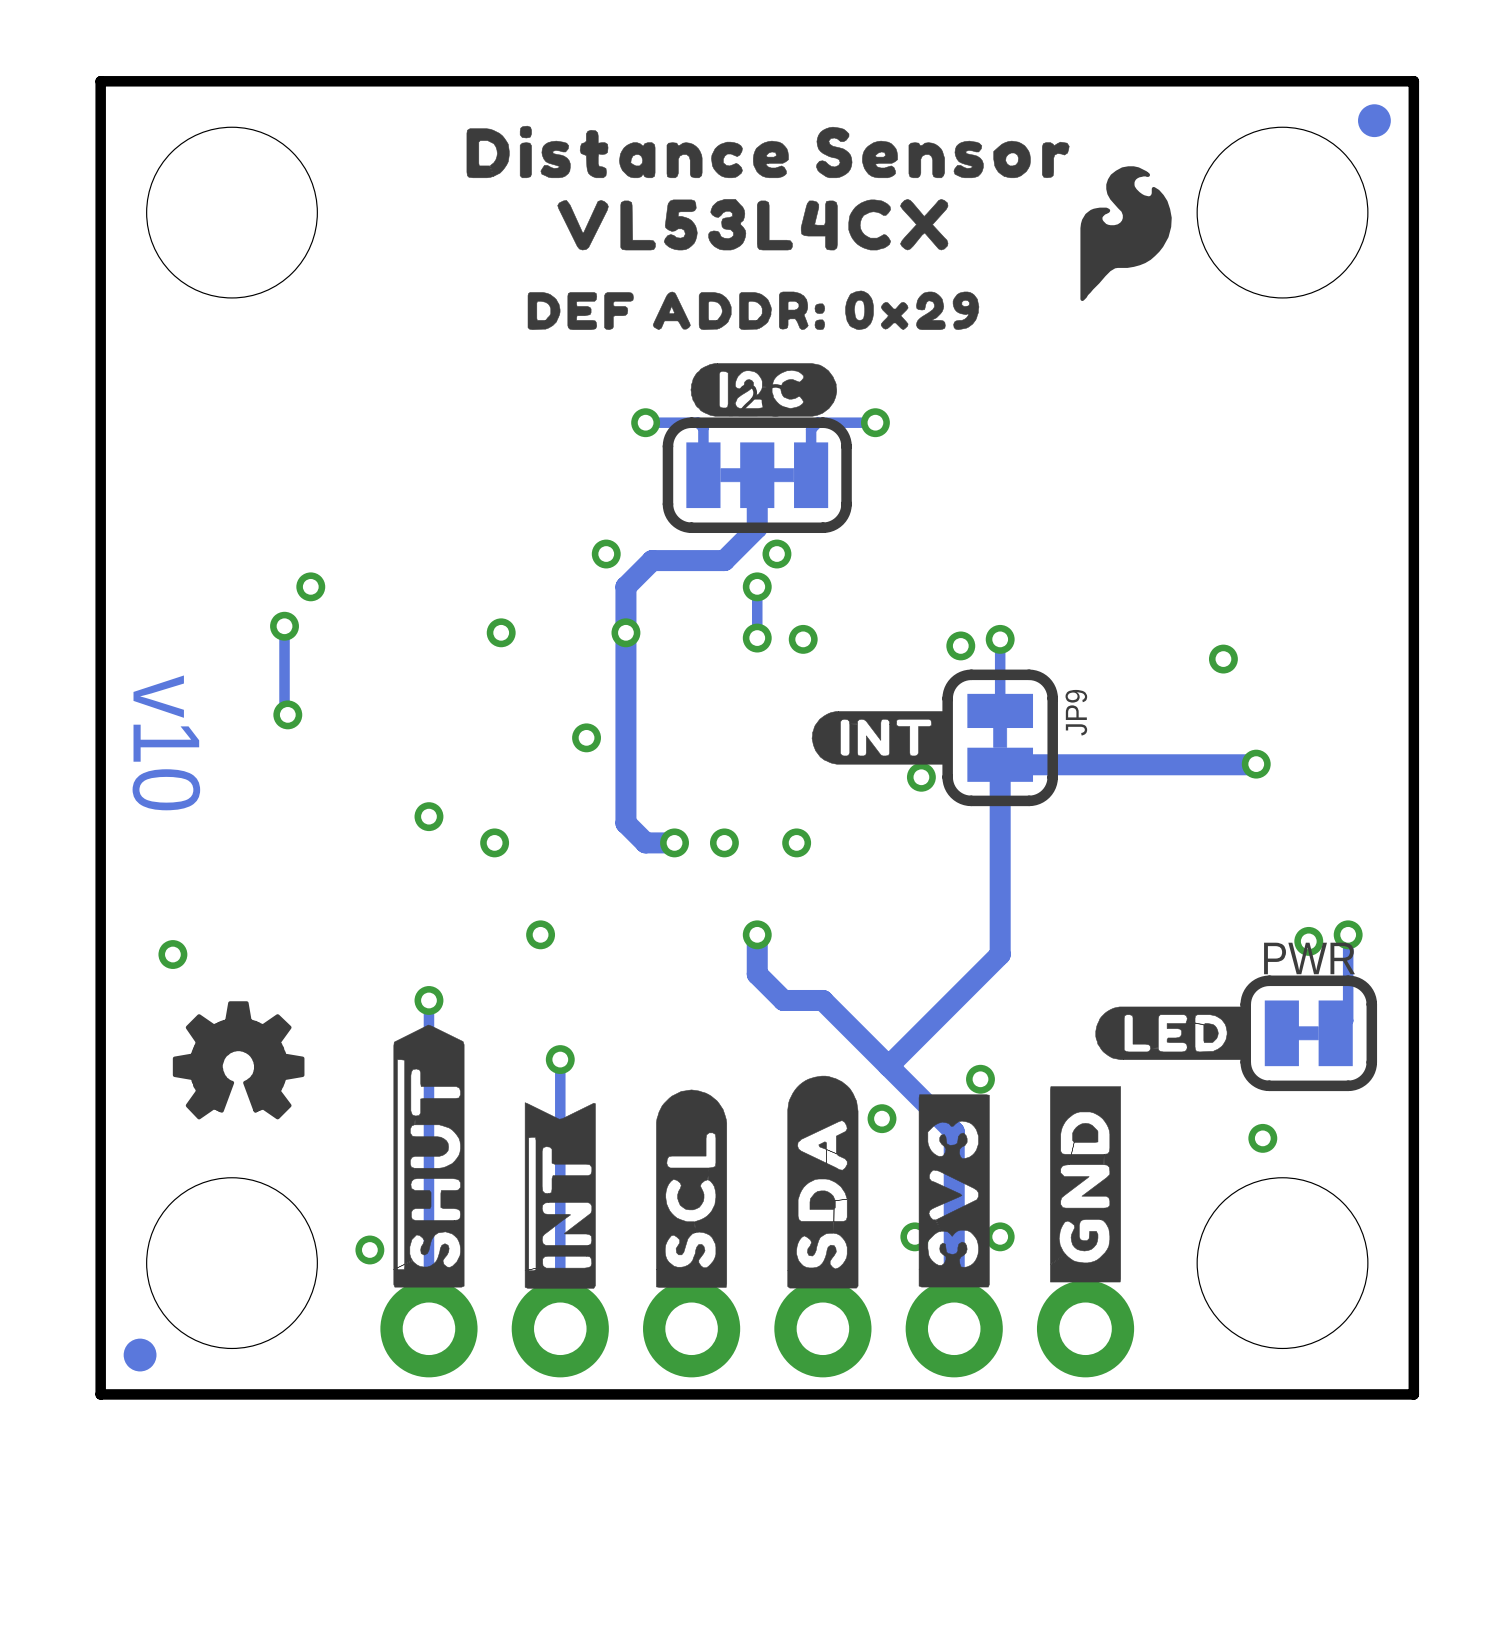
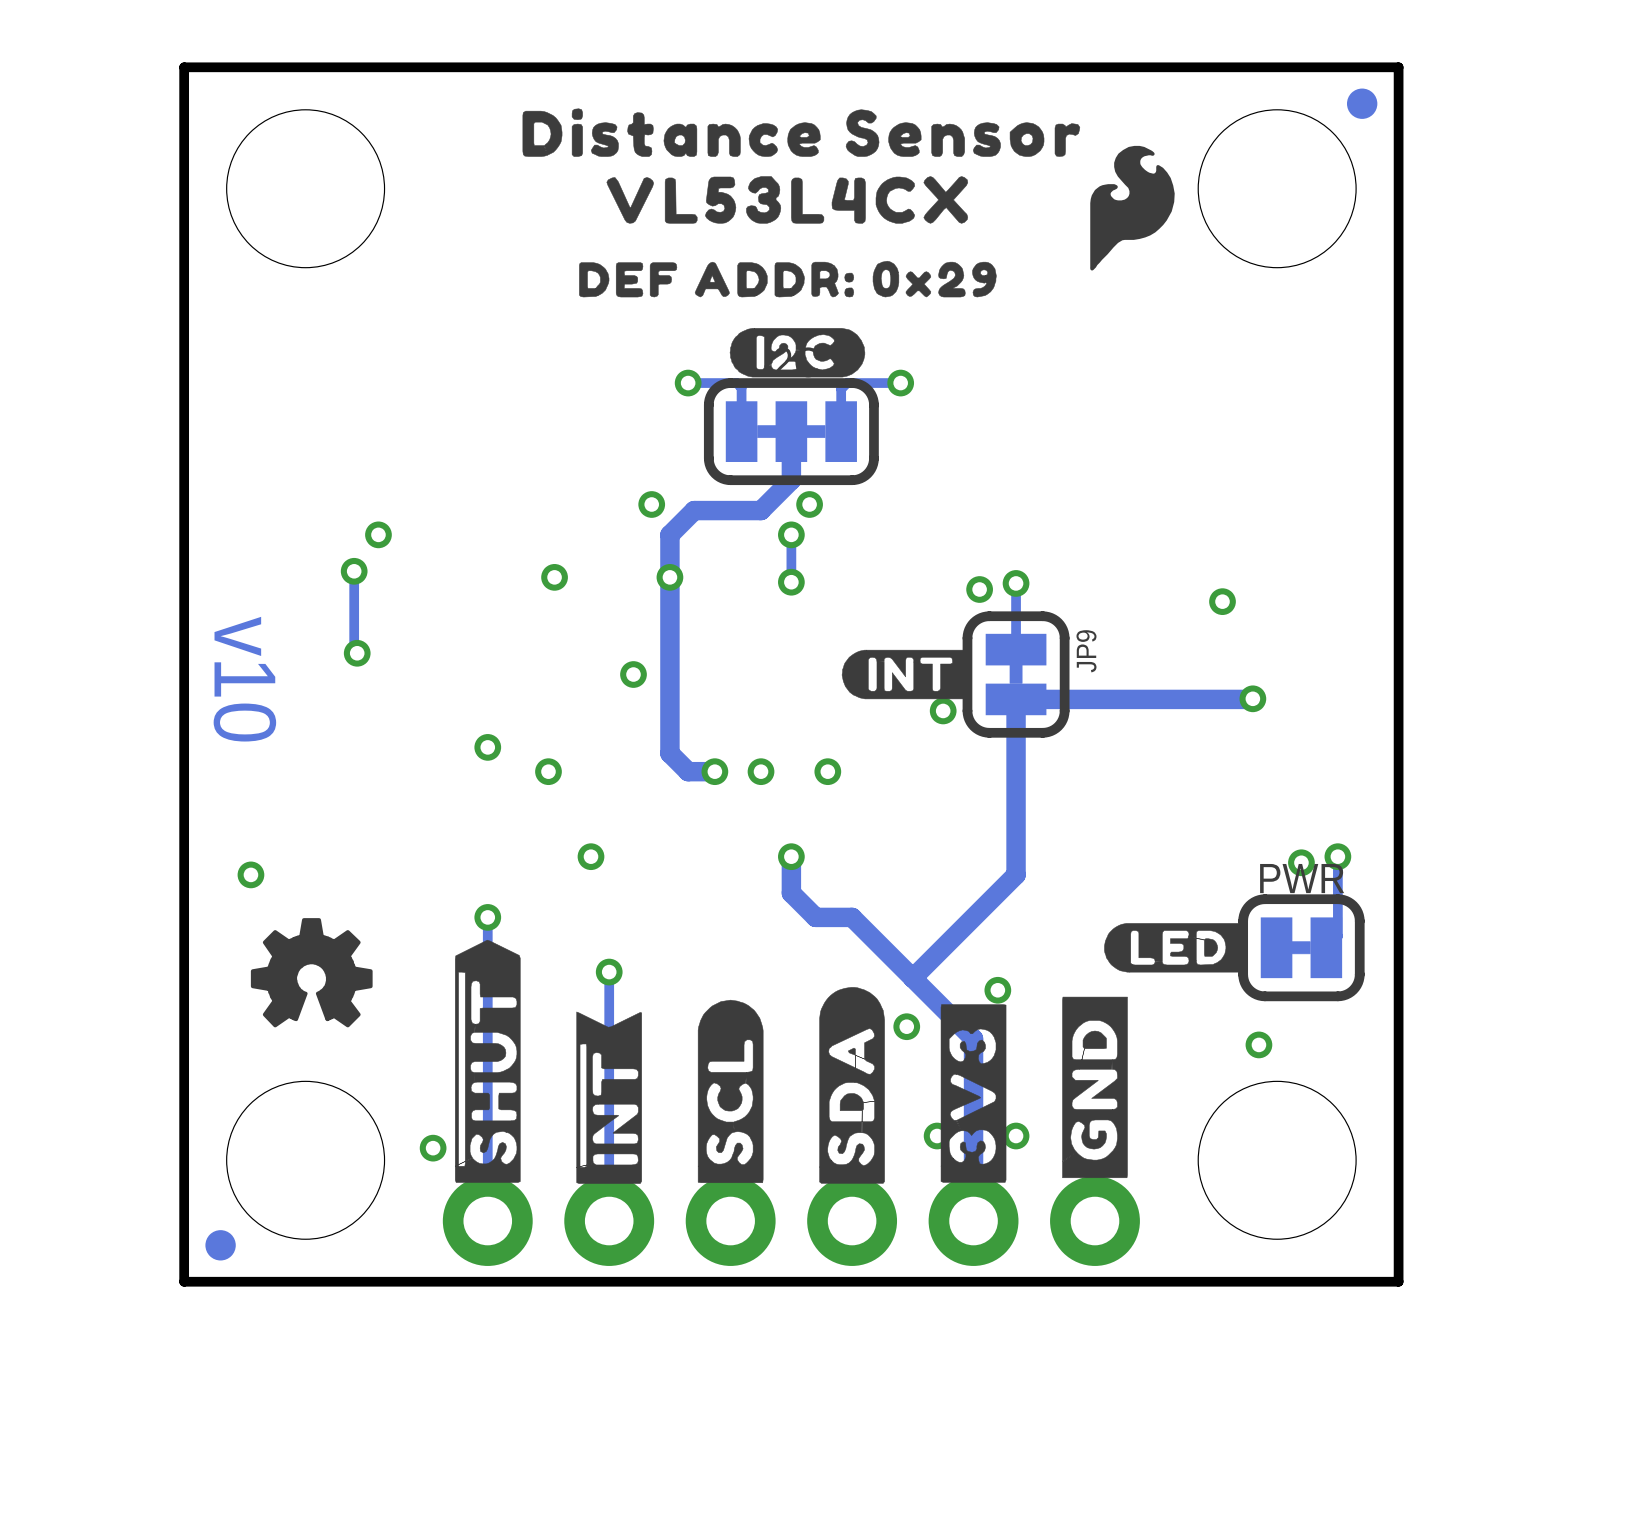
via: (803, 639) -> none

